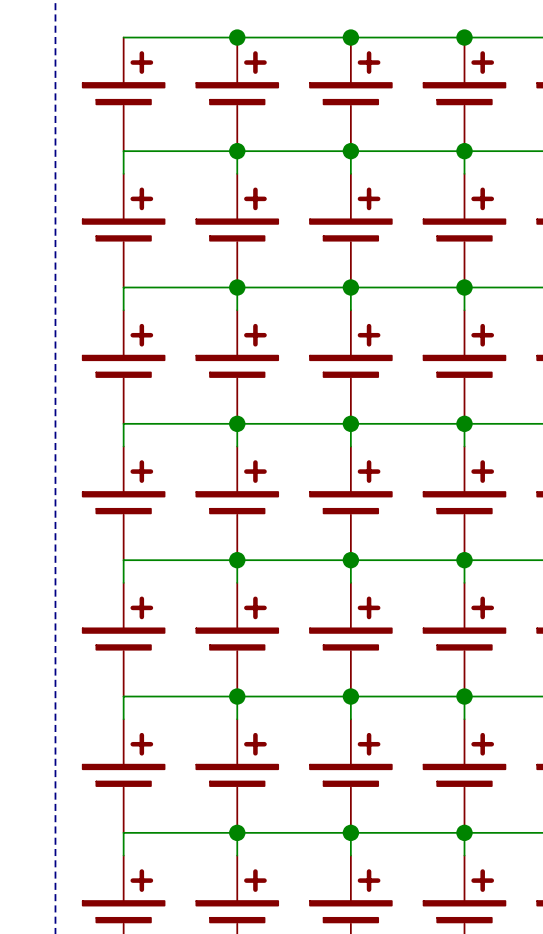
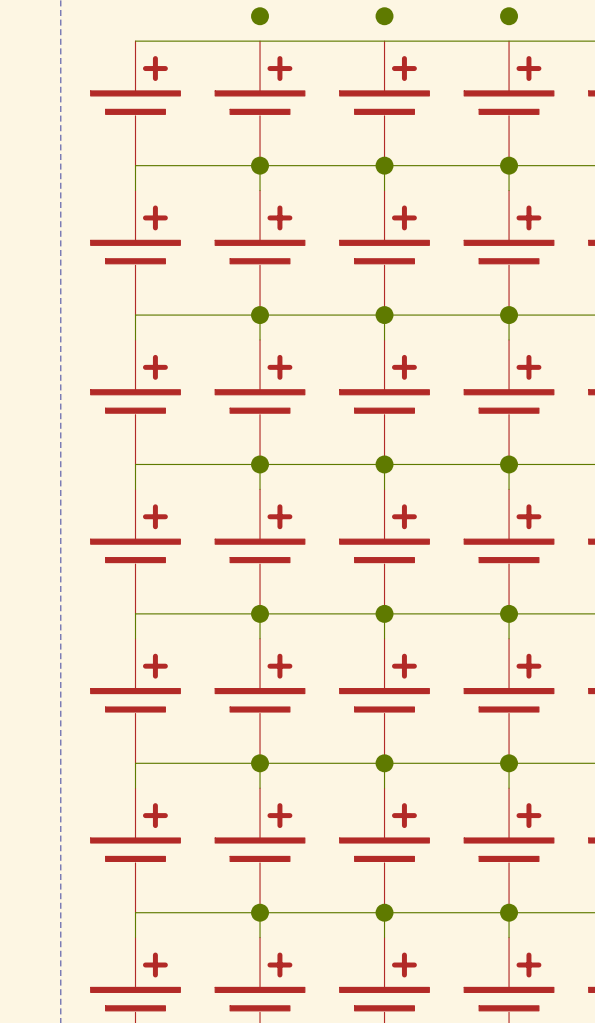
junction position: (237, 37) -> (260, 16)
junction position: (350, 37) -> (384, 16)
junction position: (464, 37) -> (509, 16)

